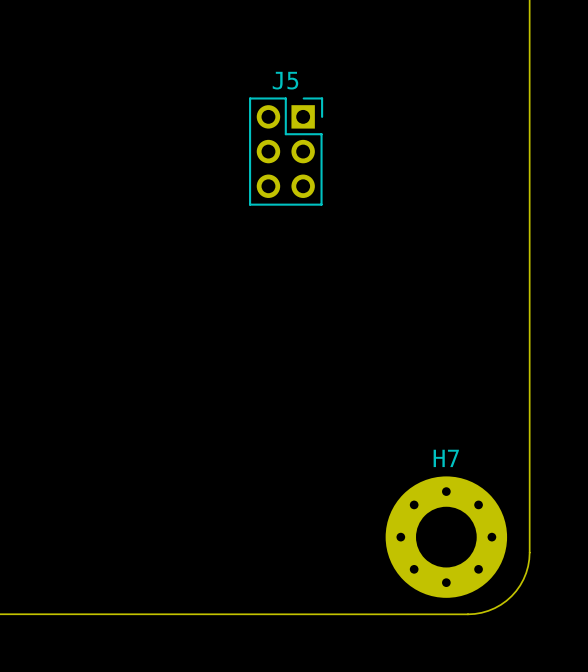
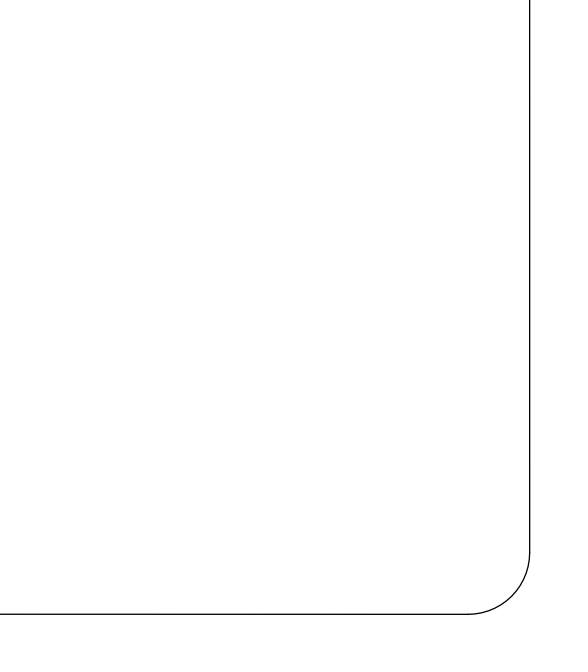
J5: (286, 151) -> none
H7: (446, 537) -> none

